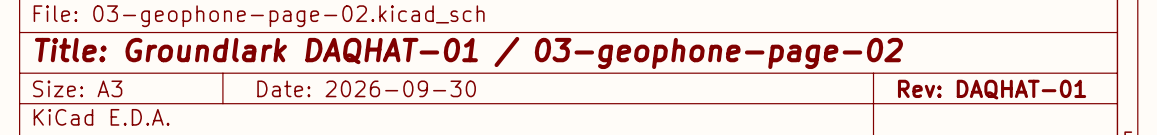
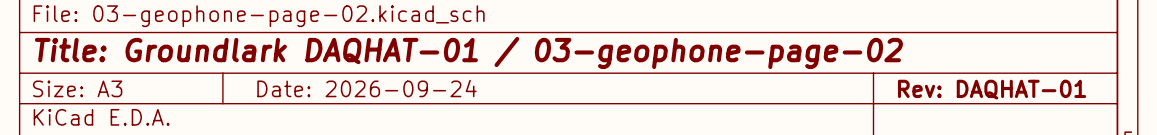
title block: Date: 2026-09-30 (366, 88) -> Date: 2026-09-24 (366, 88)

